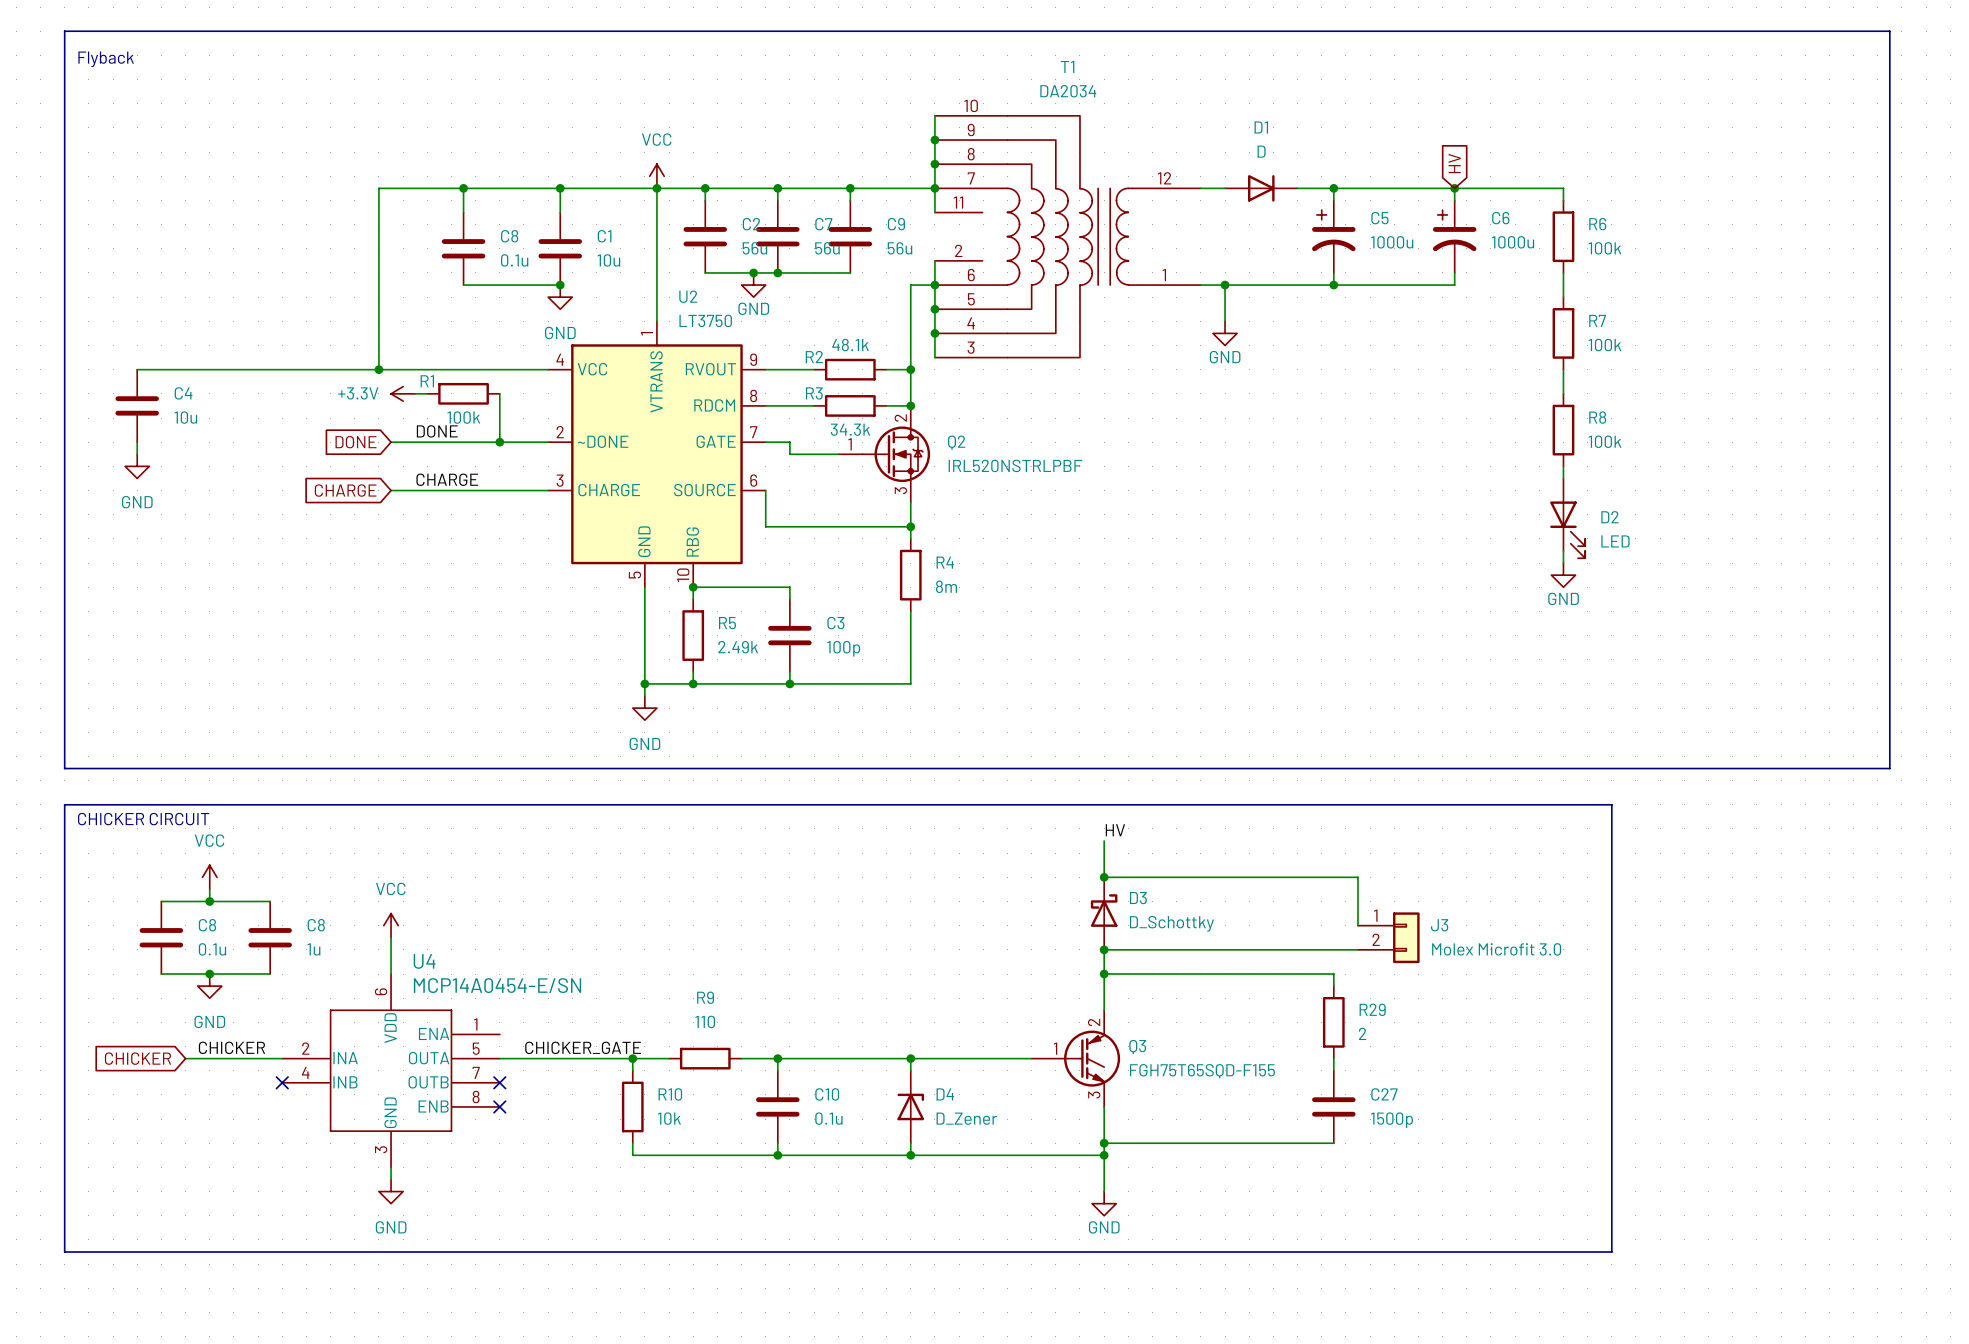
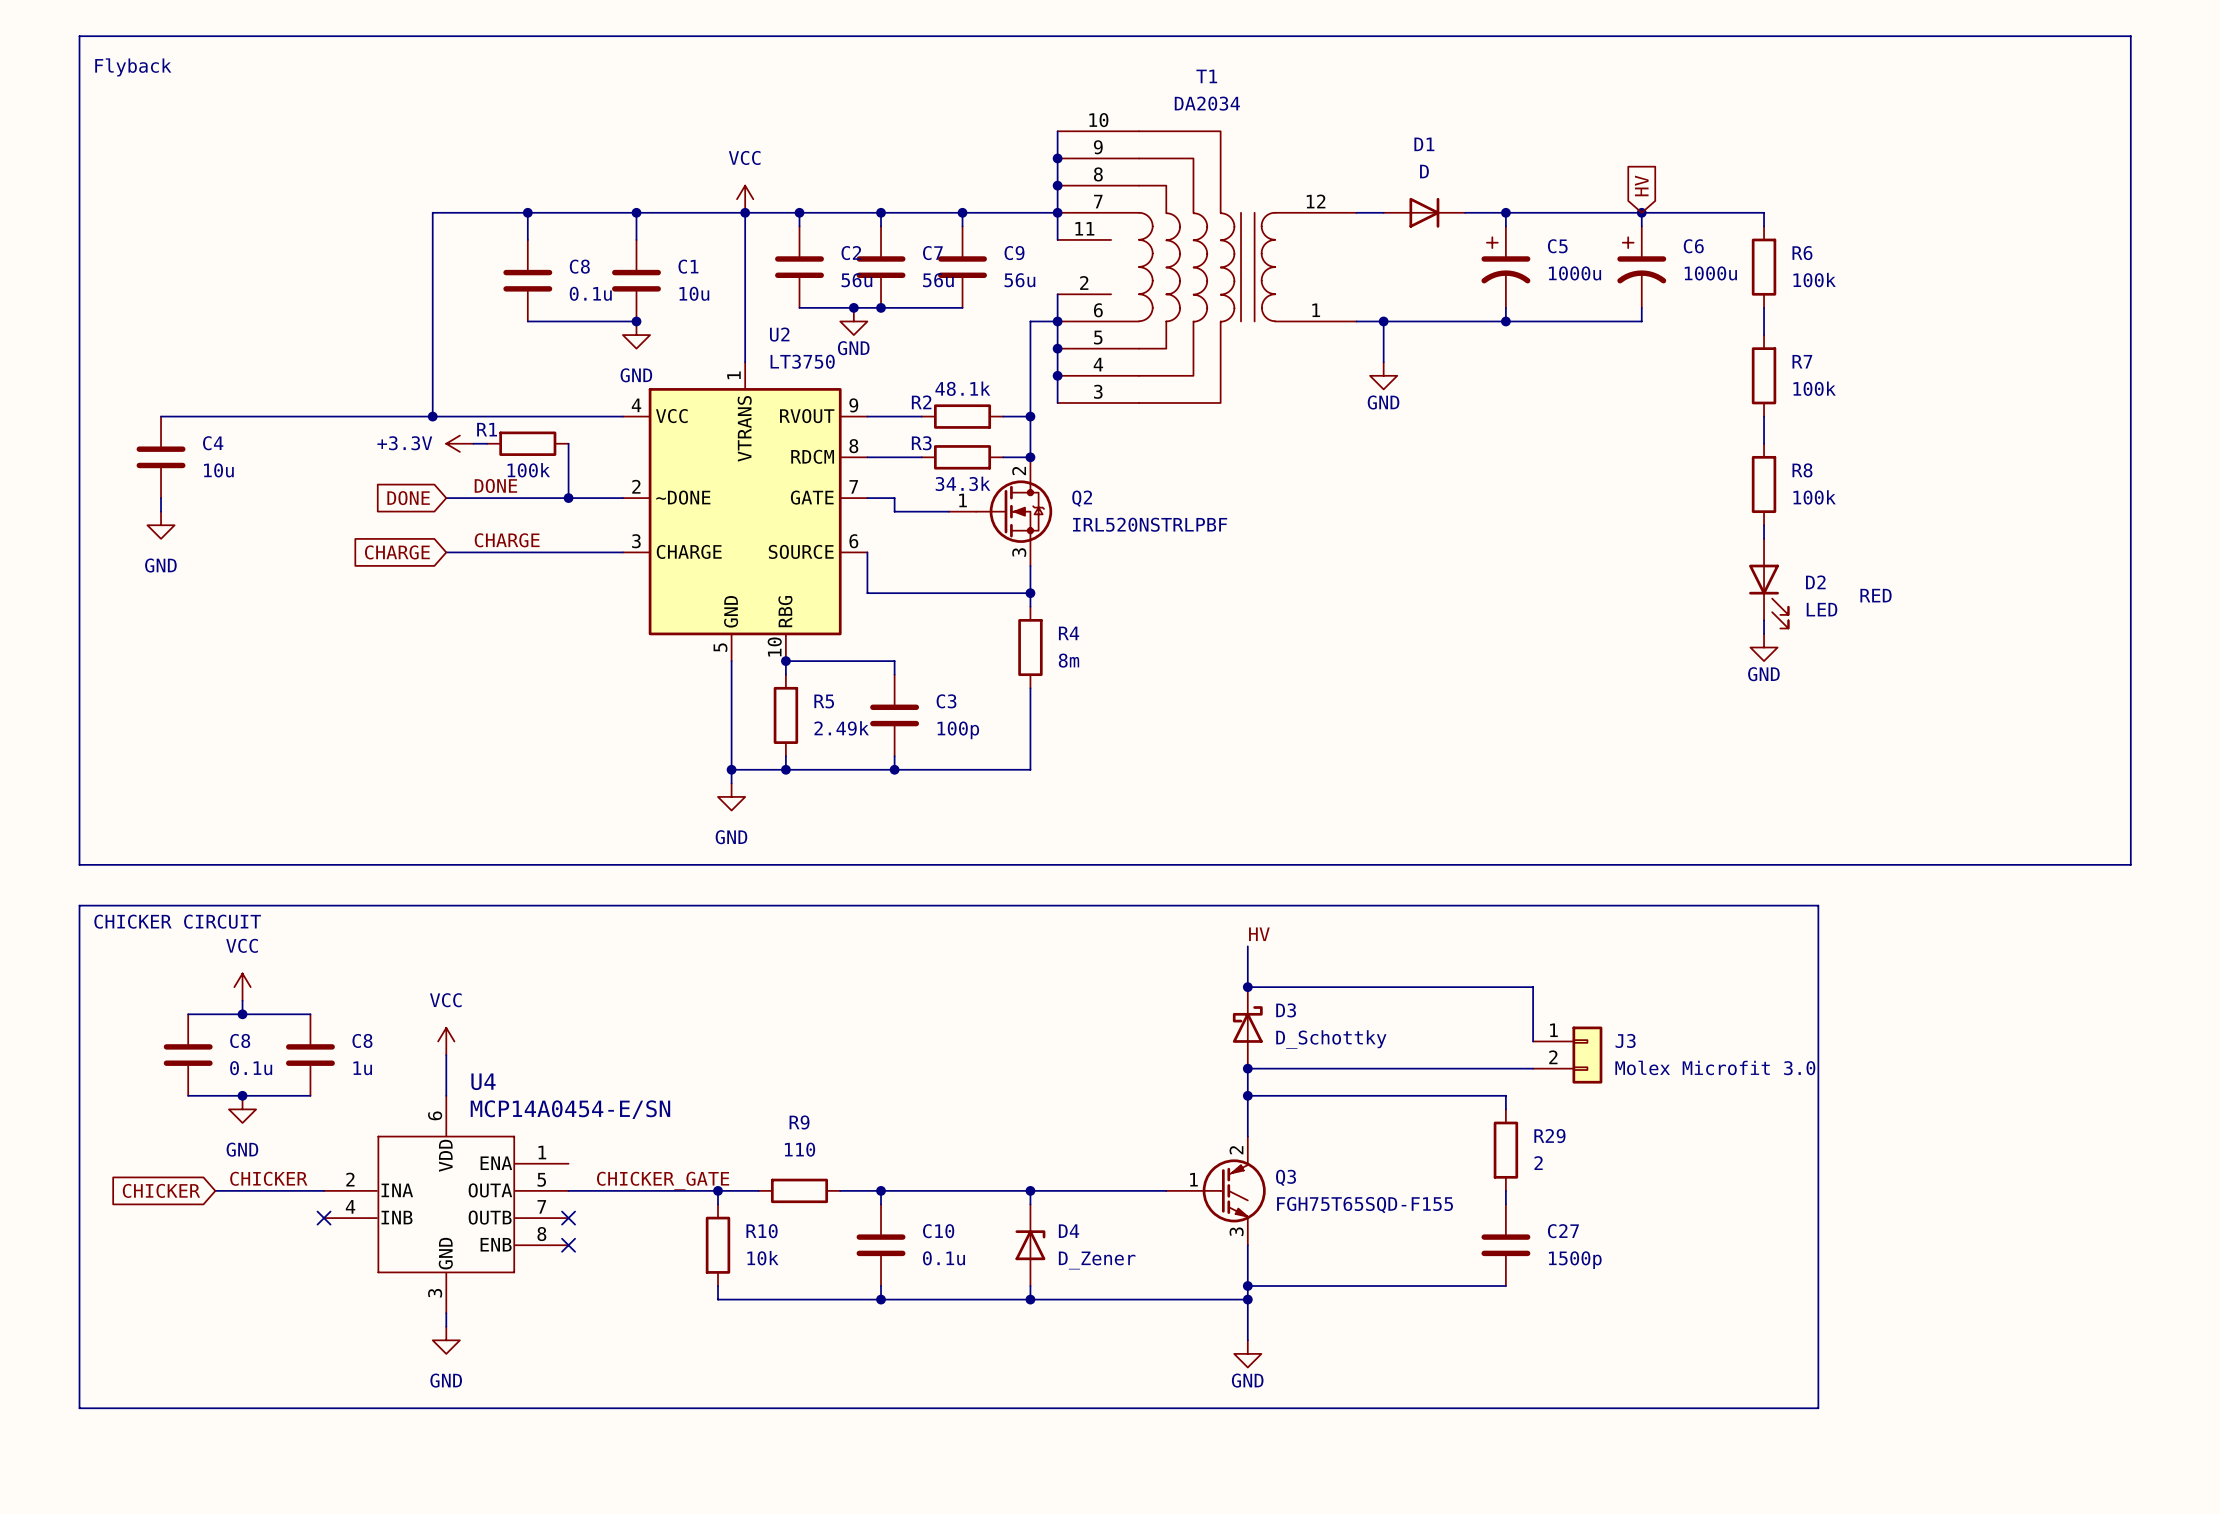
text: none -> RED (1876, 595)

